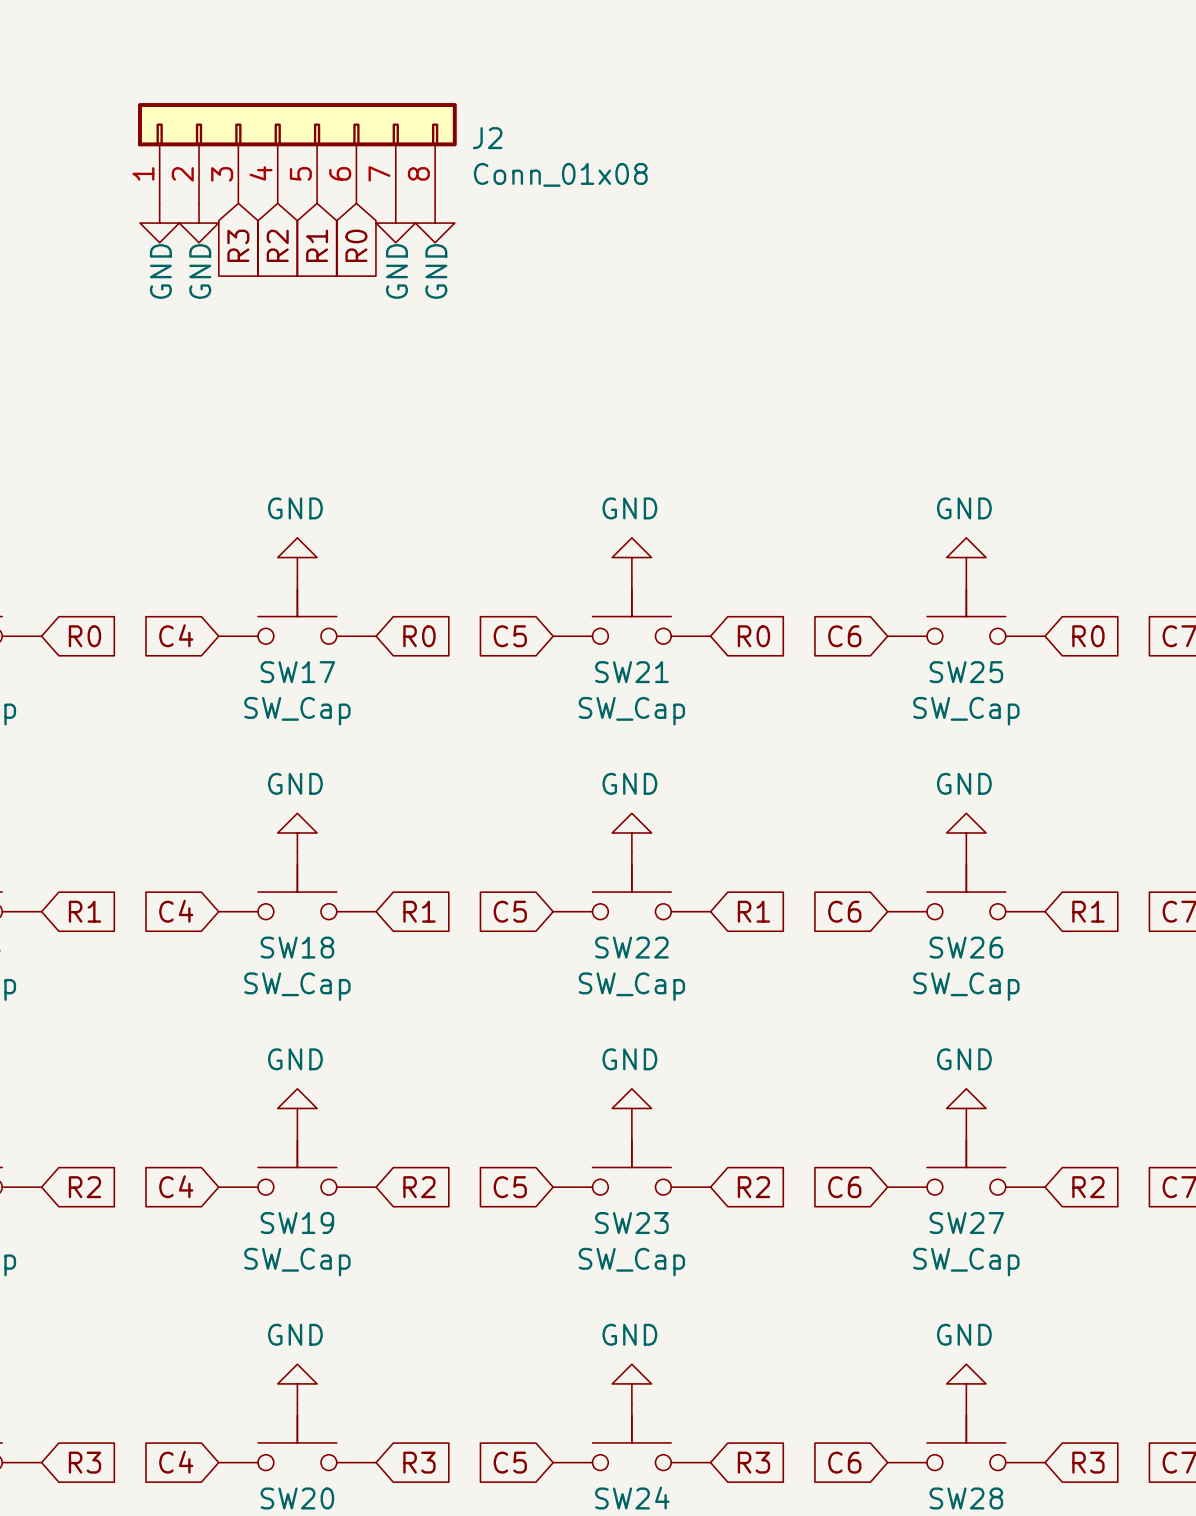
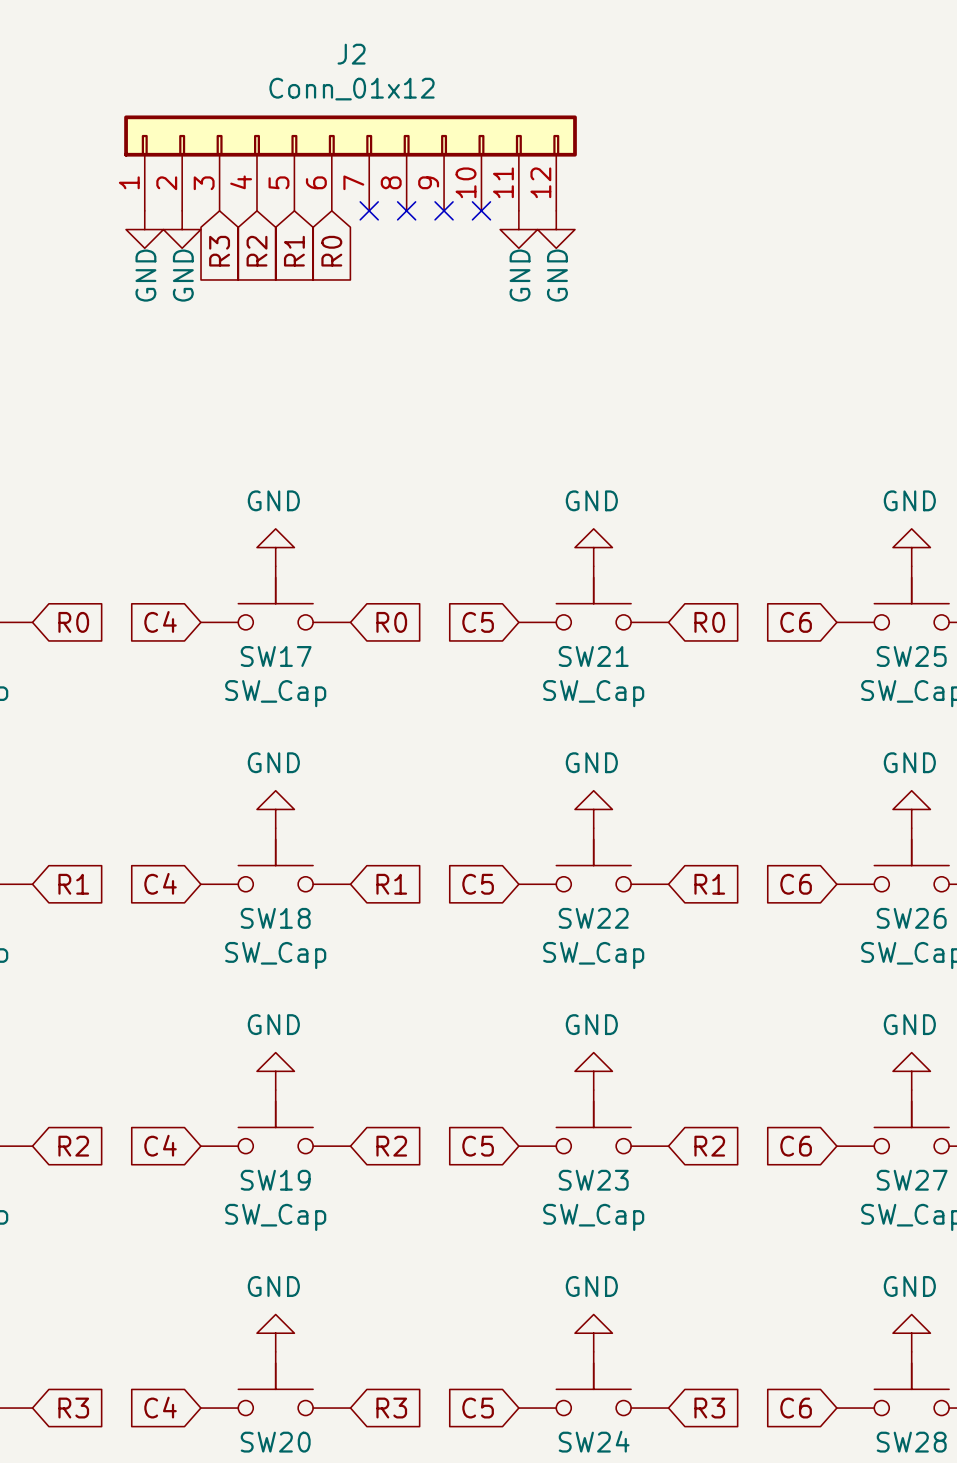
J2 symbol: [138, 103, 457, 204] -> [124, 115, 577, 211]
J2 name position: J2 (487, 138) -> J2 (351, 54)
J2 value: Conn_01x08 (560, 174) -> Conn_01x12 (352, 89)
no-connect mark: none -> (369, 210)
no-connect mark: none -> (406, 210)
no-connect mark: none -> (444, 210)
no-connect mark: none -> (481, 210)
power symbol: GND (395, 223) -> none
power symbol: GND (435, 223) -> none
power symbol: none -> GND (518, 229)
power symbol: none -> GND (556, 229)

